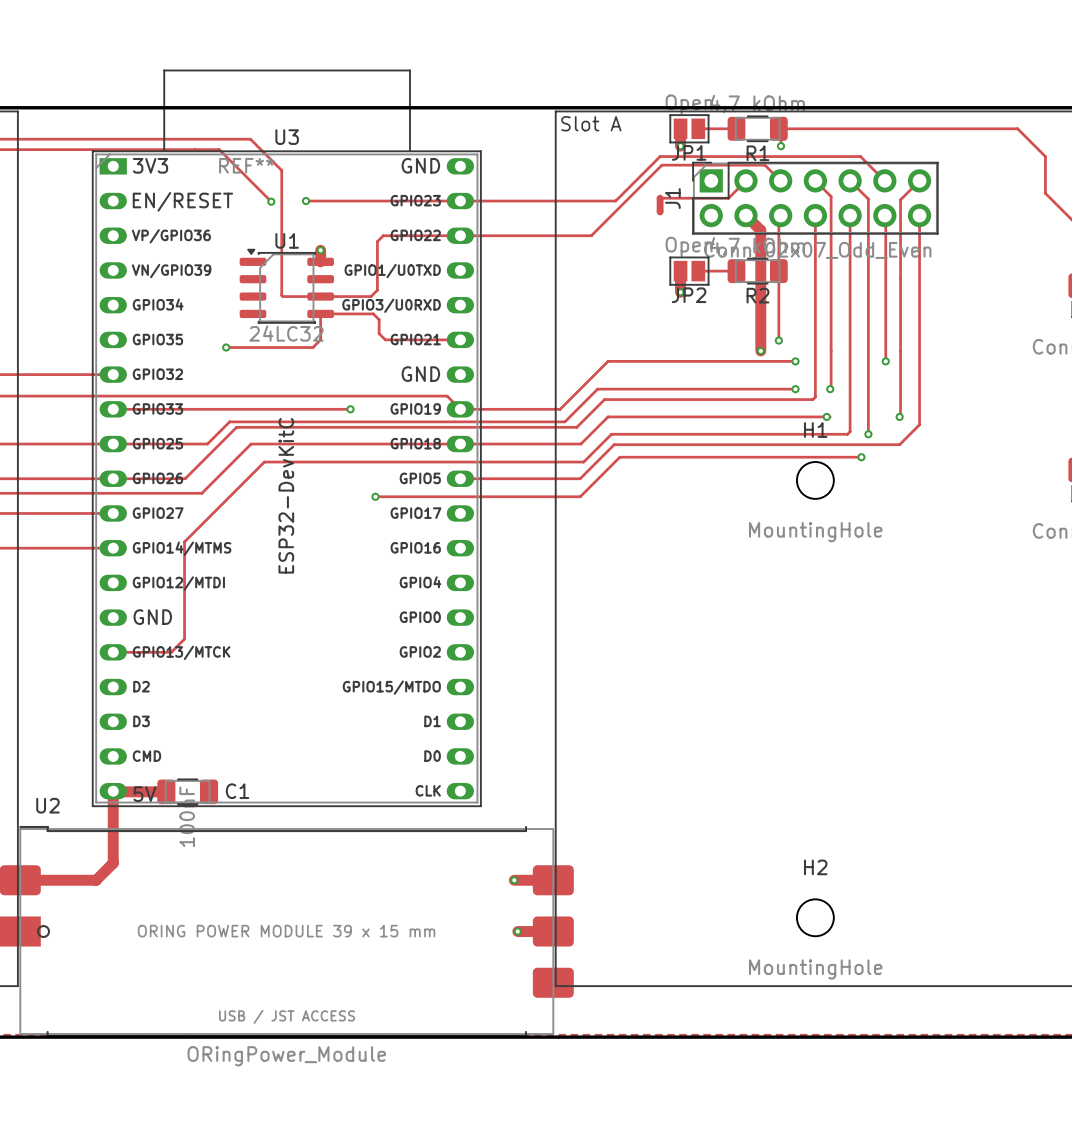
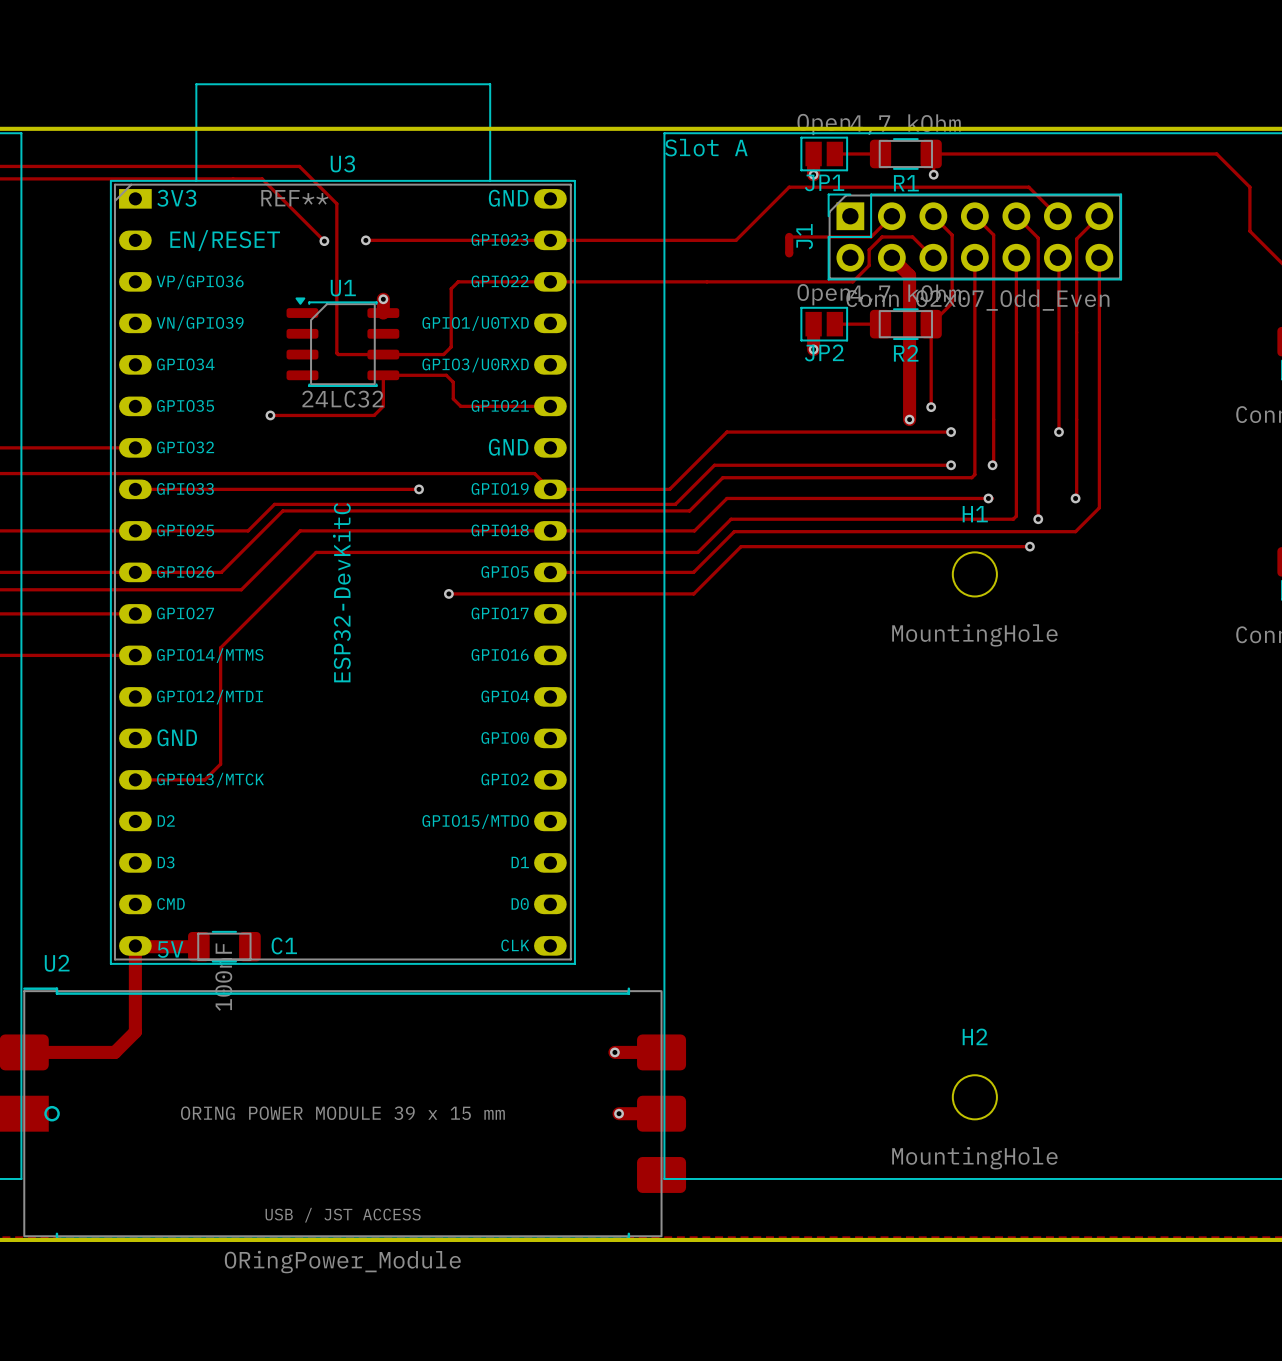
track: (780, 180) (764, 165) (661, 165) (591, 235) -> (933, 257) (912, 236) (882, 236) (869, 249) (869, 265) (852, 281) (707, 281)
track: (778, 217) (778, 271) -> (933, 216) (952, 235) (952, 303) (931, 324)

